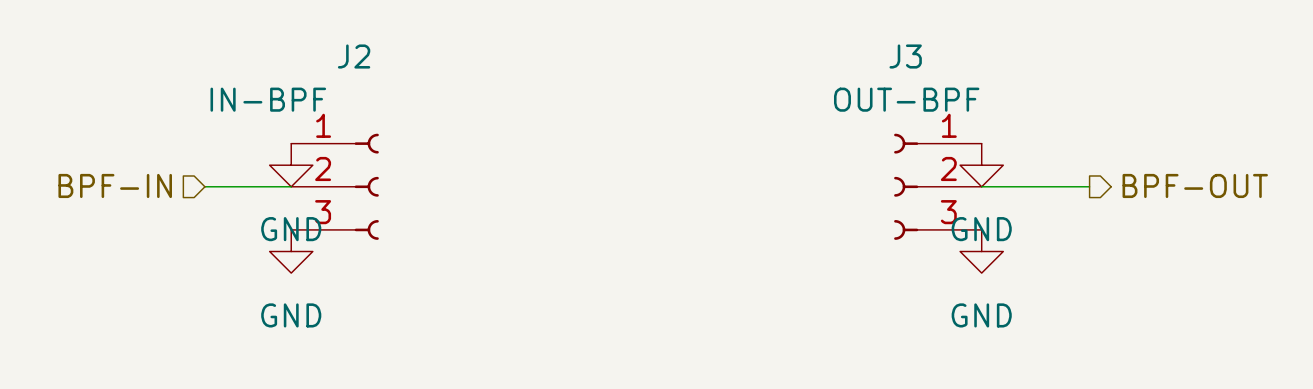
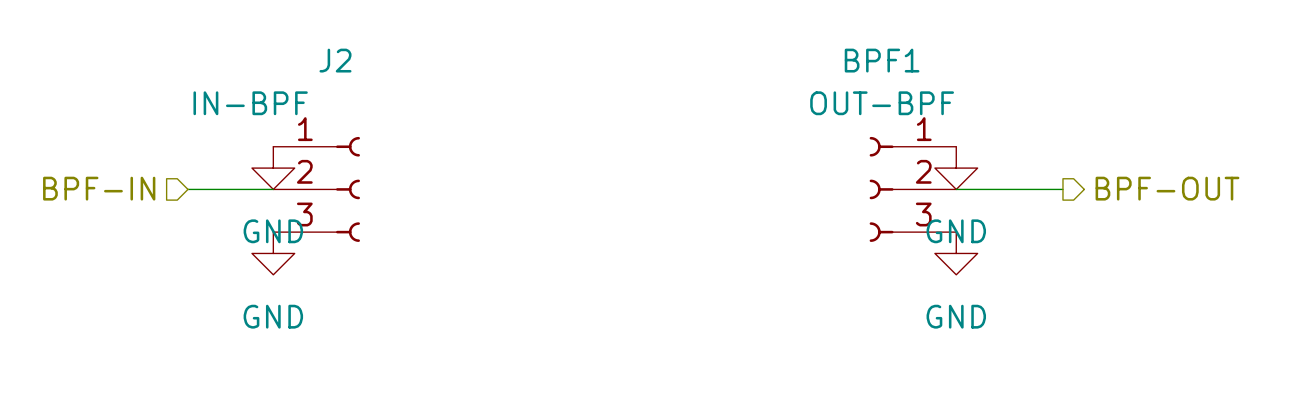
J3 name: J3 (905, 56) -> BPF1 (882, 60)

